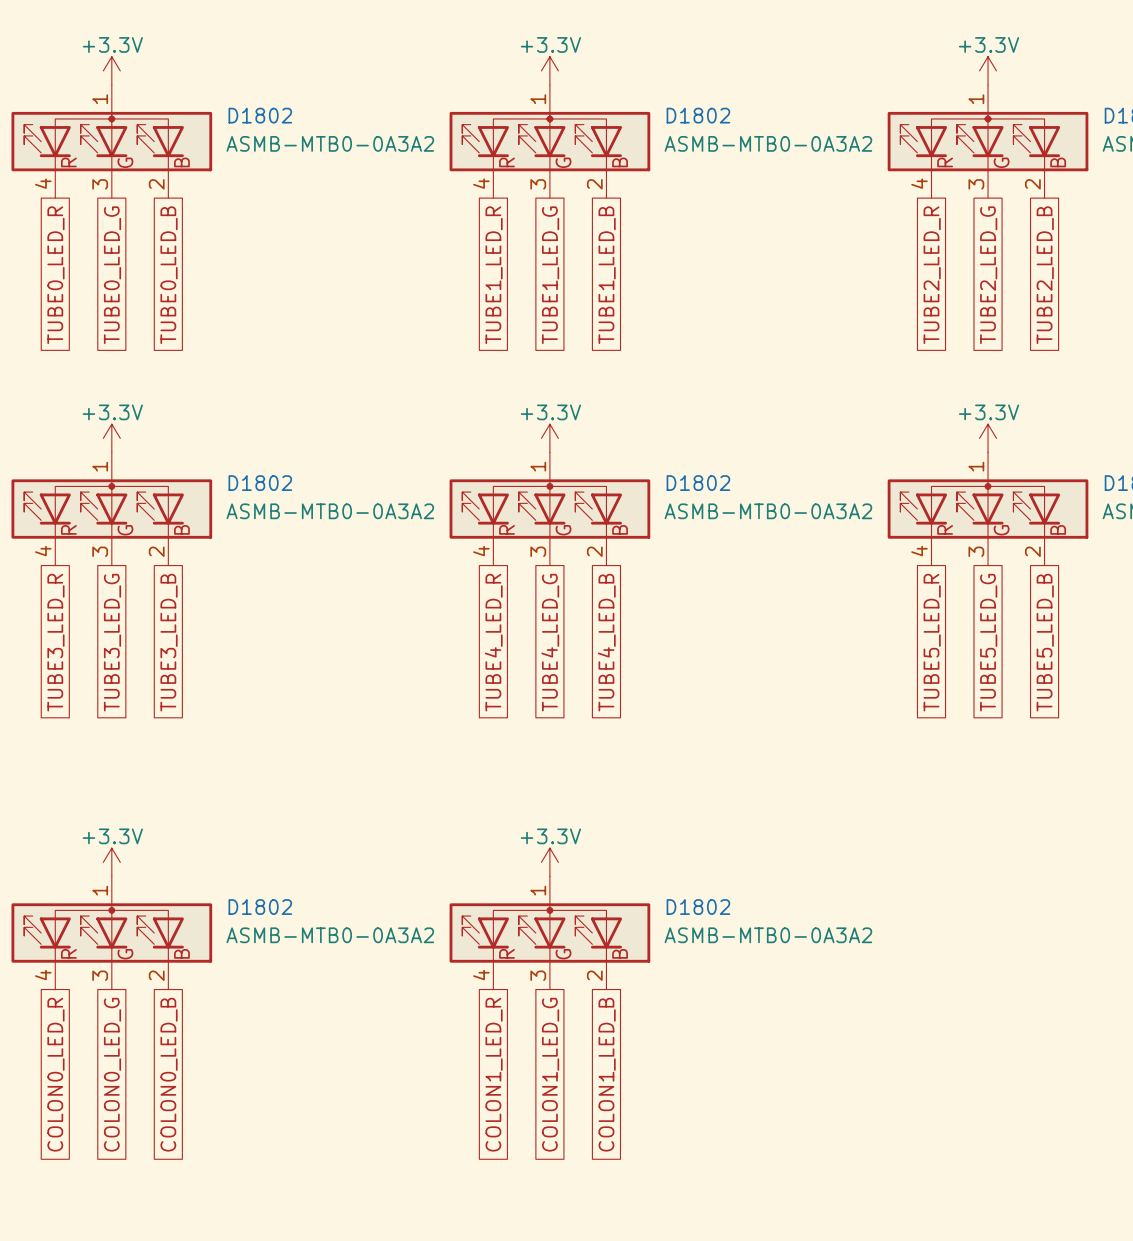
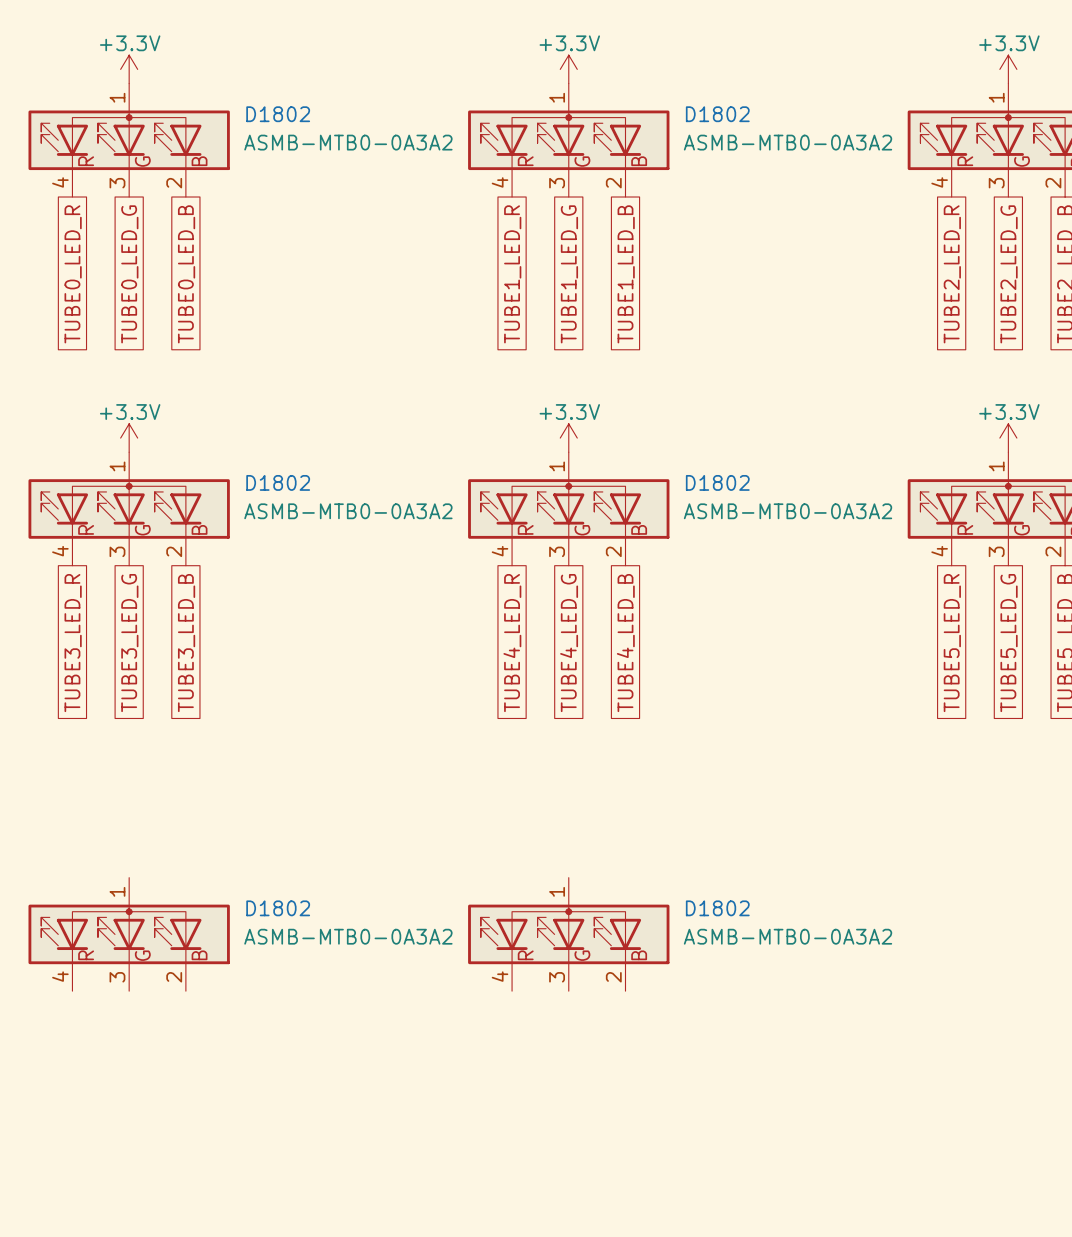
power symbol: +3.3V (111, 862) -> none
power symbol: +3.3V (549, 862) -> none
global label: COLON0_LED_R (55, 1074) -> none
global label: COLON0_LED_G (112, 1074) -> none
global label: COLON0_LED_B (169, 1074) -> none
global label: COLON1_LED_R (494, 1074) -> none
global label: COLON1_LED_G (550, 1074) -> none
global label: COLON1_LED_B (607, 1074) -> none

